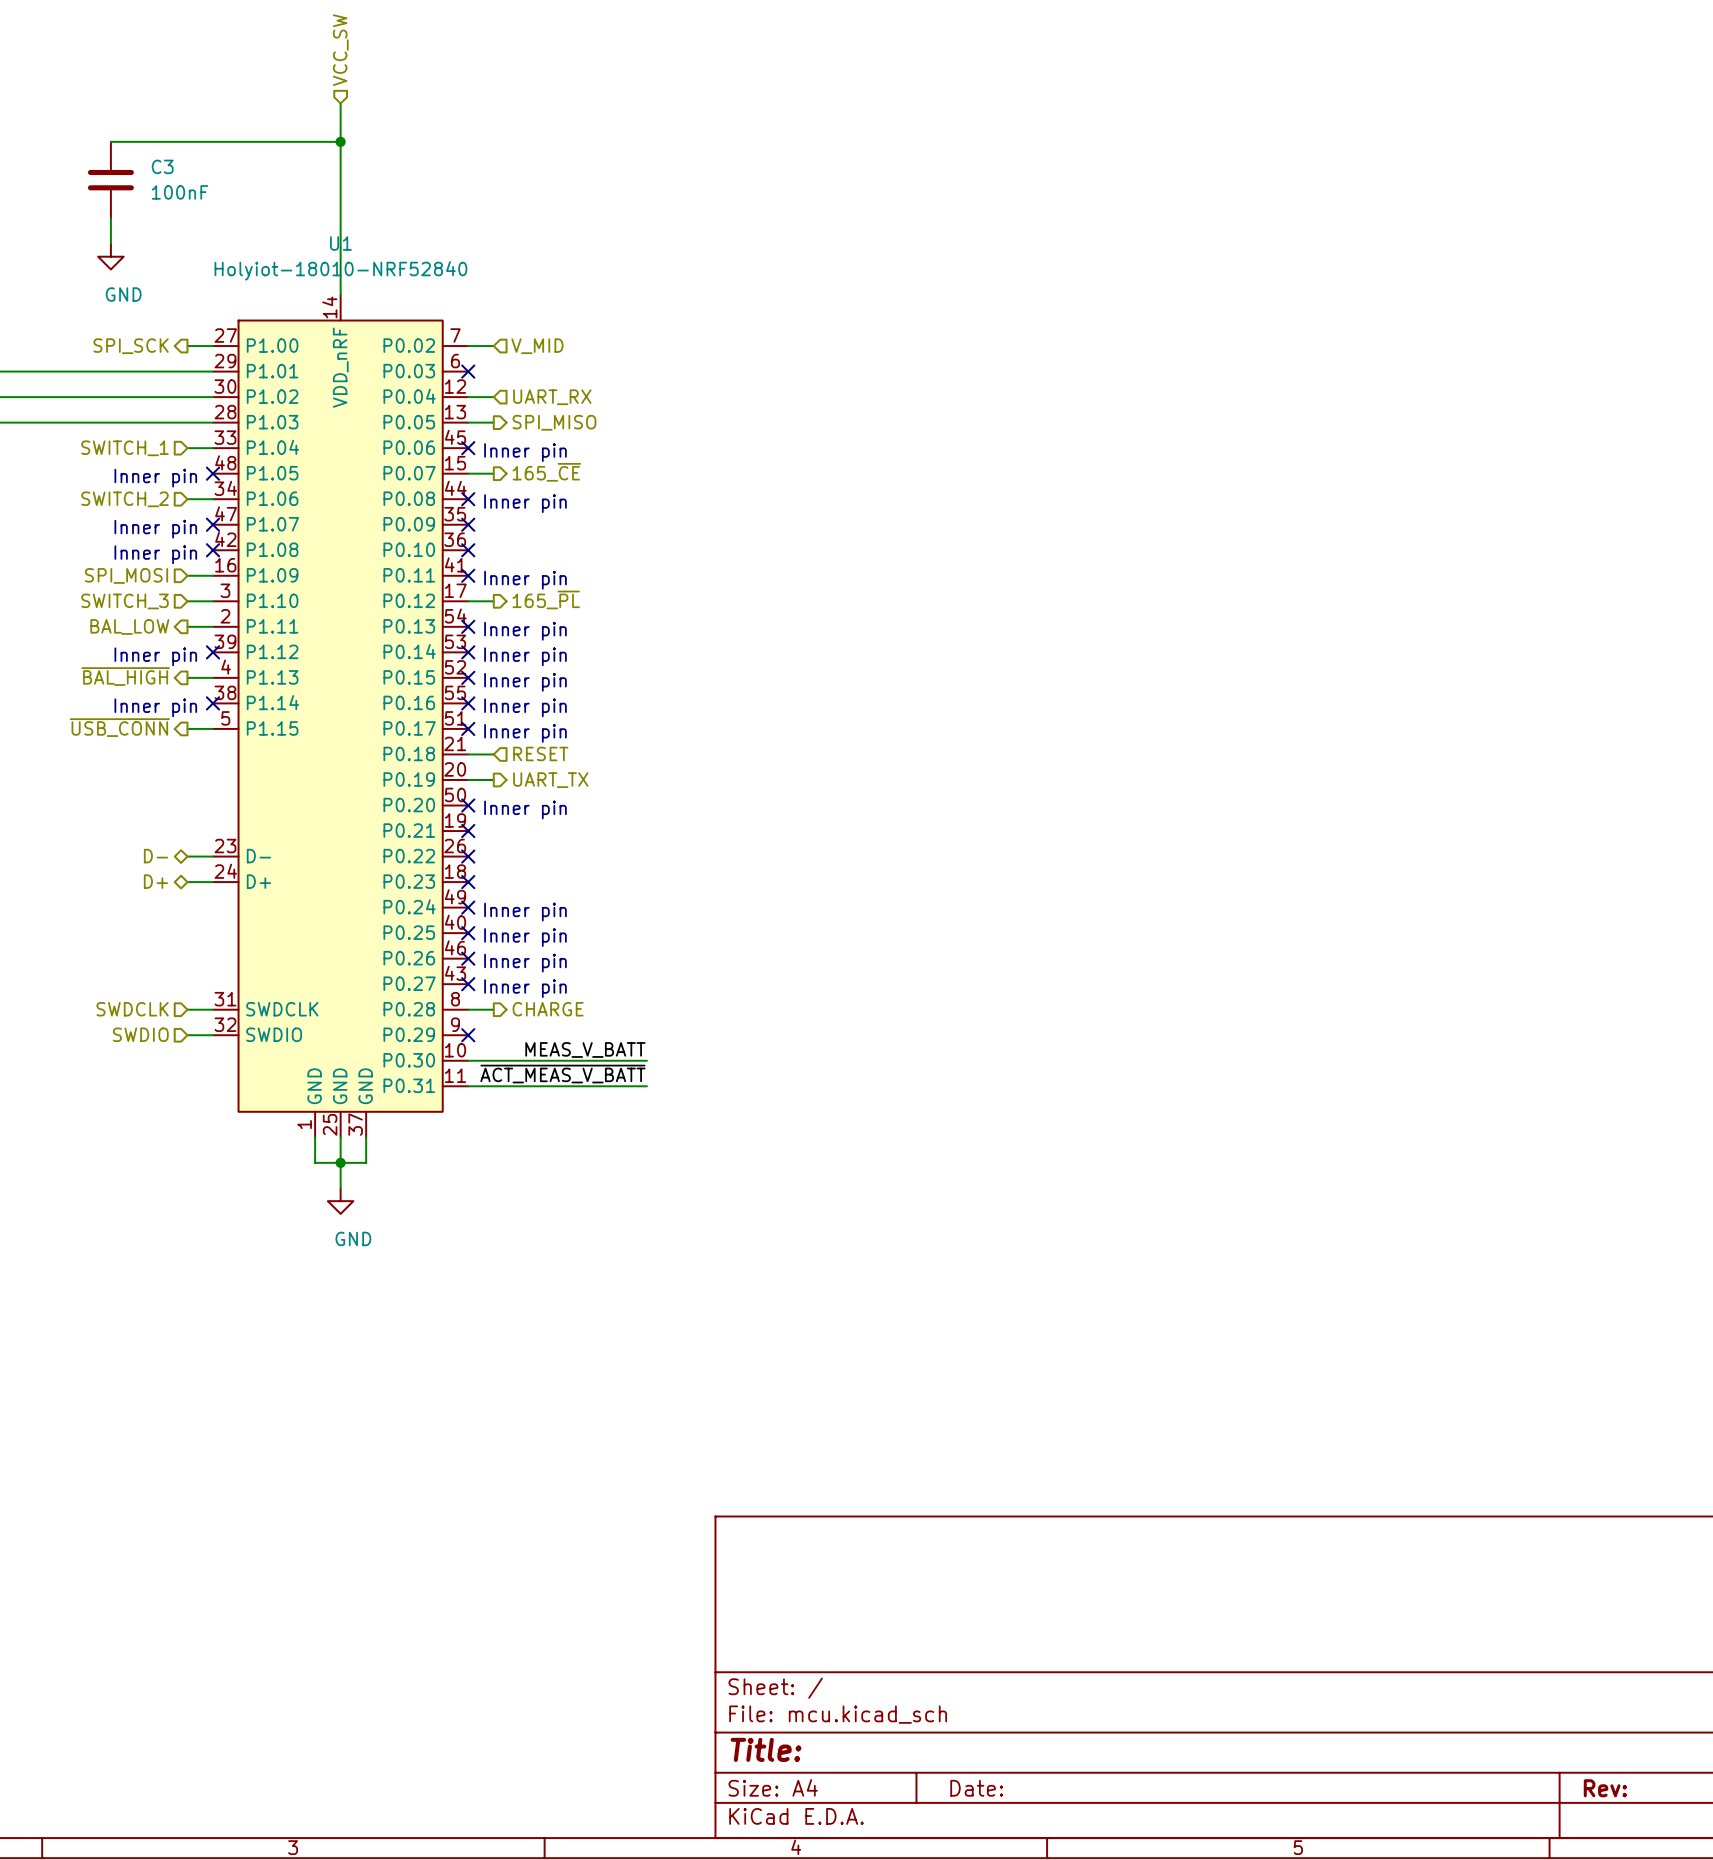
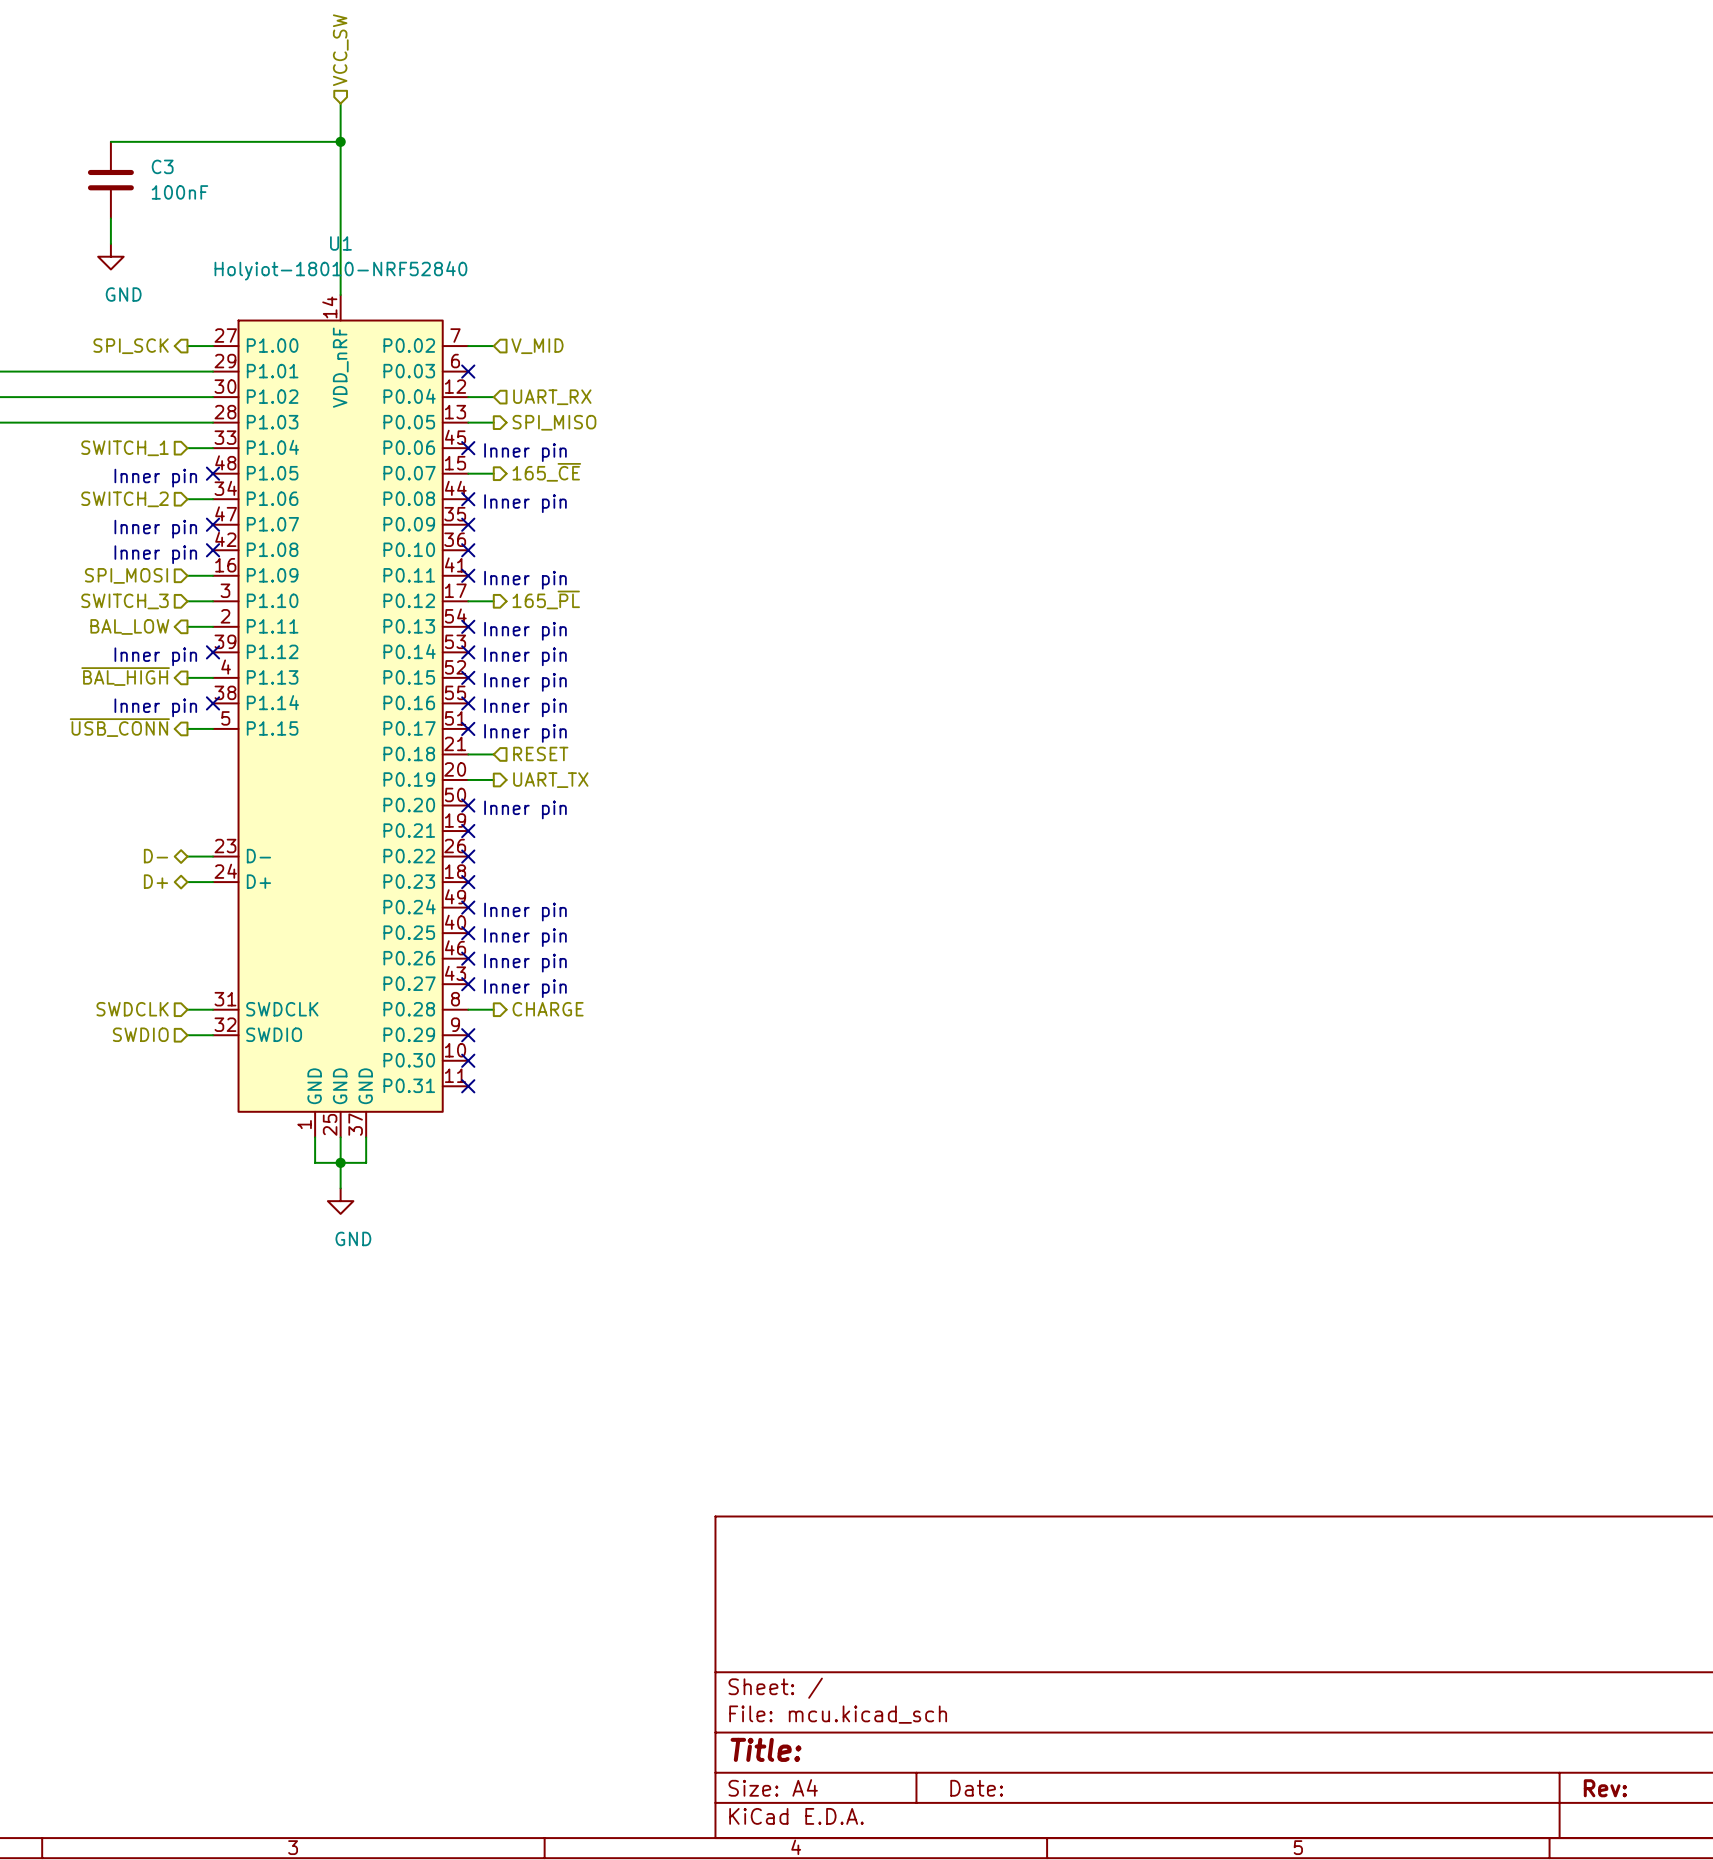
label: MEAS_V_BATT (585, 1049) -> none
wire: (468, 1060) (646, 1060) -> none
no-connect mark: none -> (468, 1060)
label: ~{ACT_MEAS_V_BATT} (562, 1074) -> none
wire: (468, 1086) (646, 1086) -> none
no-connect mark: none -> (468, 1086)

